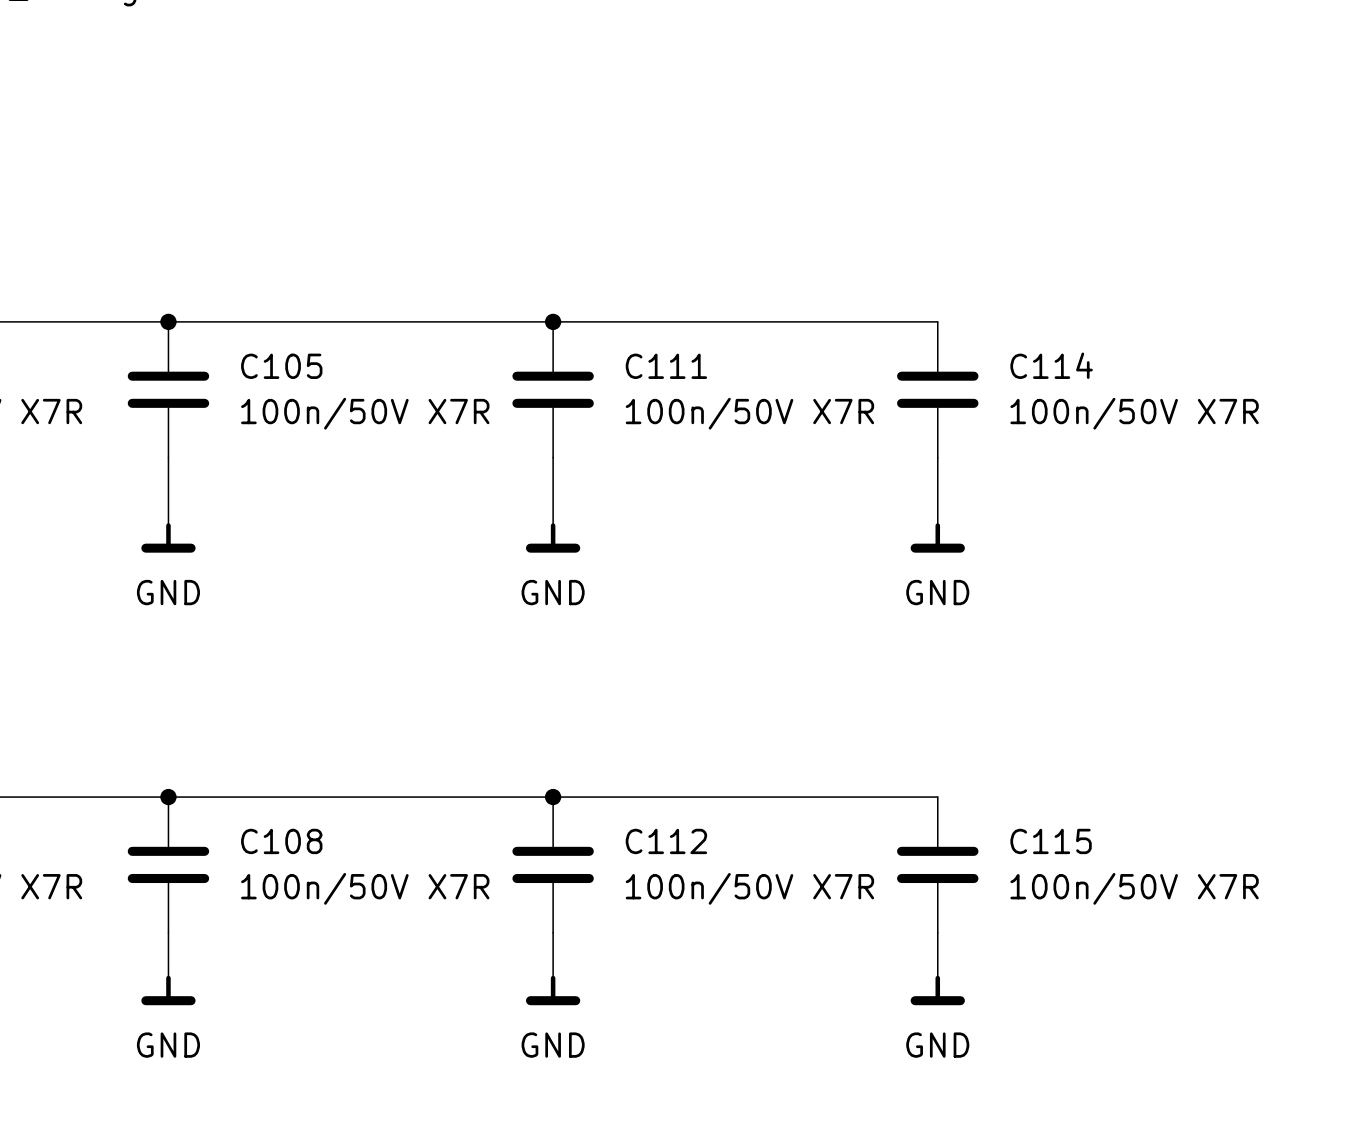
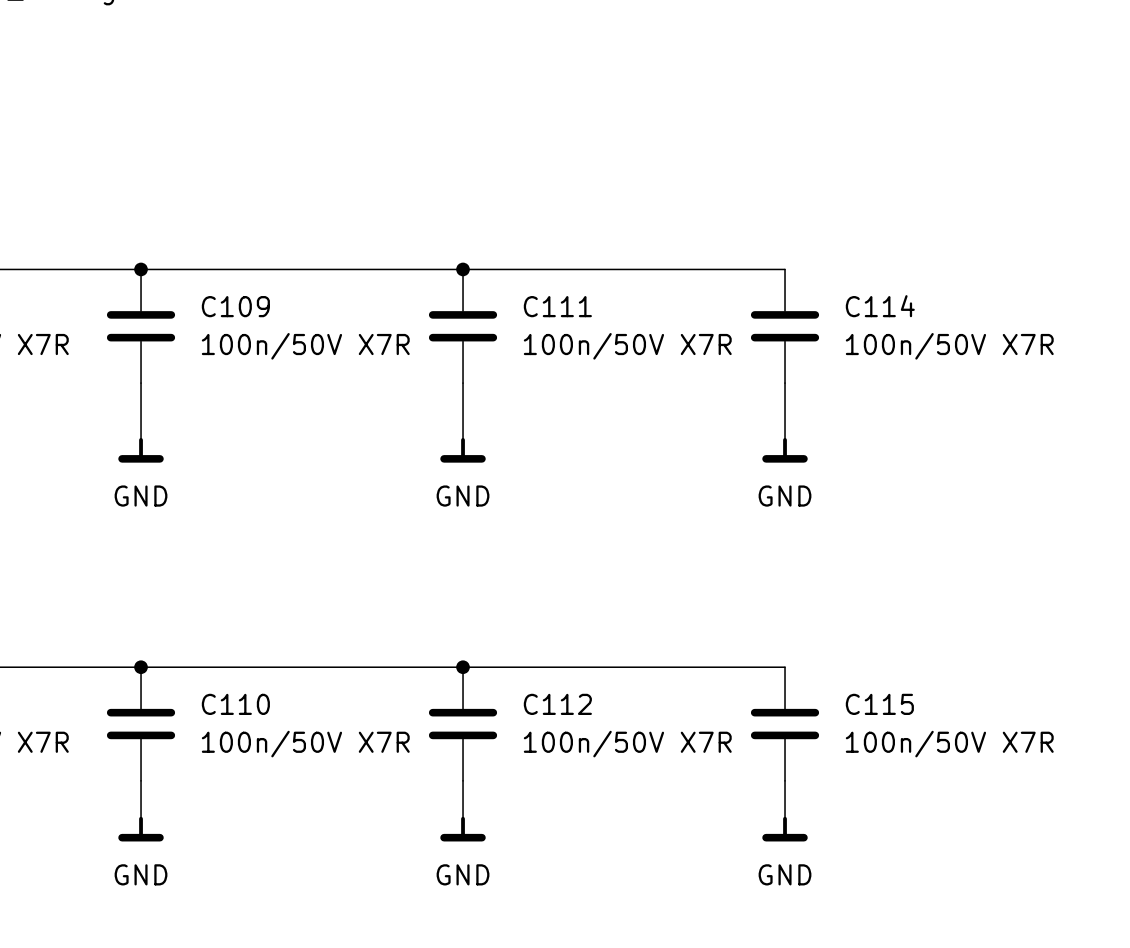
C105 name: C105 (281, 366) -> C109 (235, 306)
C108 name: C108 (281, 841) -> C110 (235, 704)

